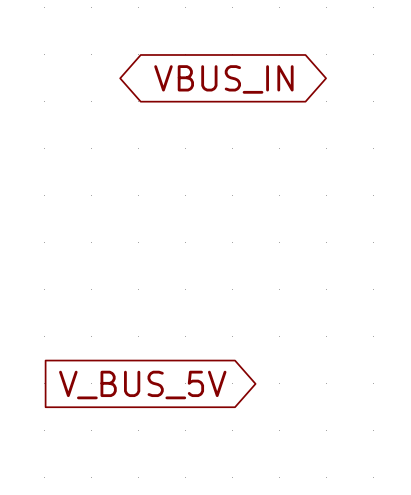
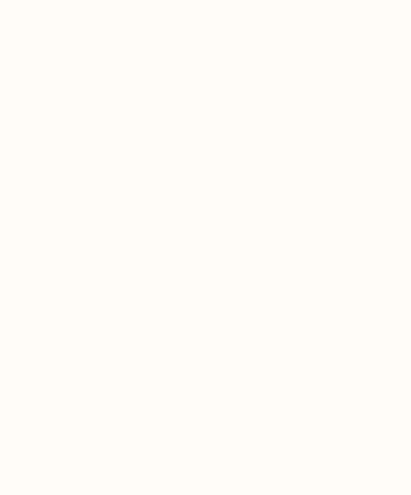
global label: VBUS_IN (223, 79) -> none
global label: V_BUS_5V (142, 385) -> none

